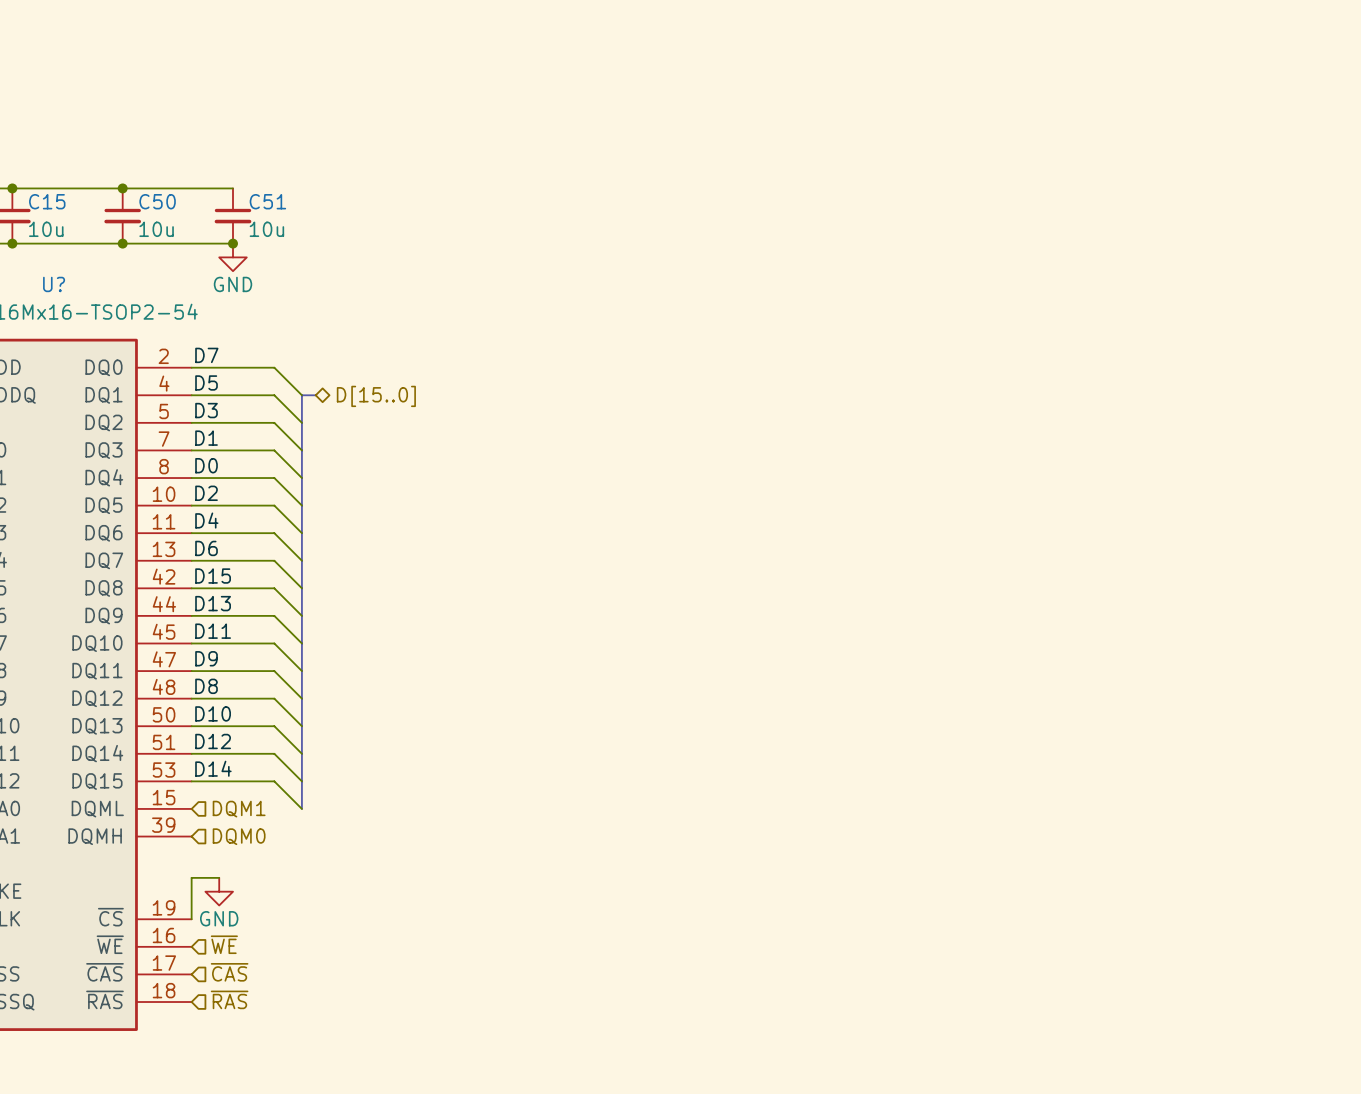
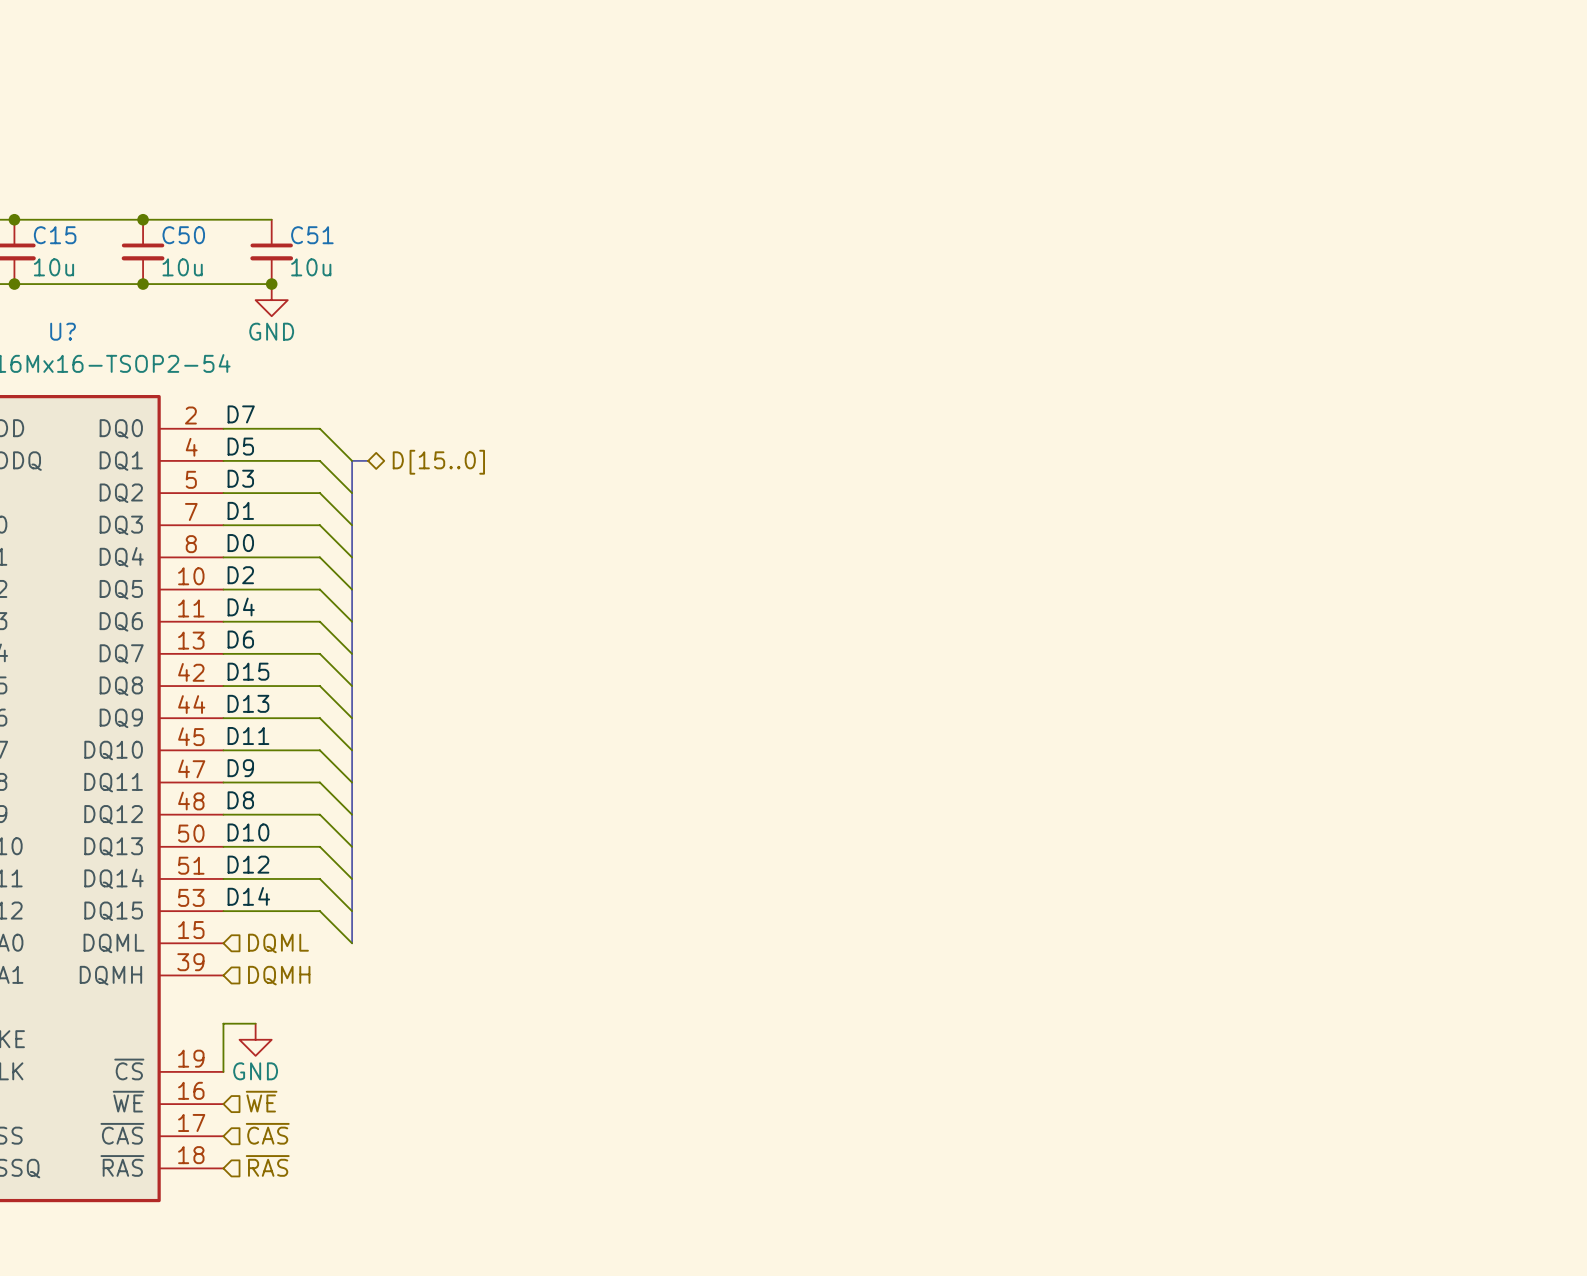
hierarchical label: DQM1 (239, 809) -> DQML (278, 943)
hierarchical label: DQM0 (239, 836) -> DQMH (279, 975)

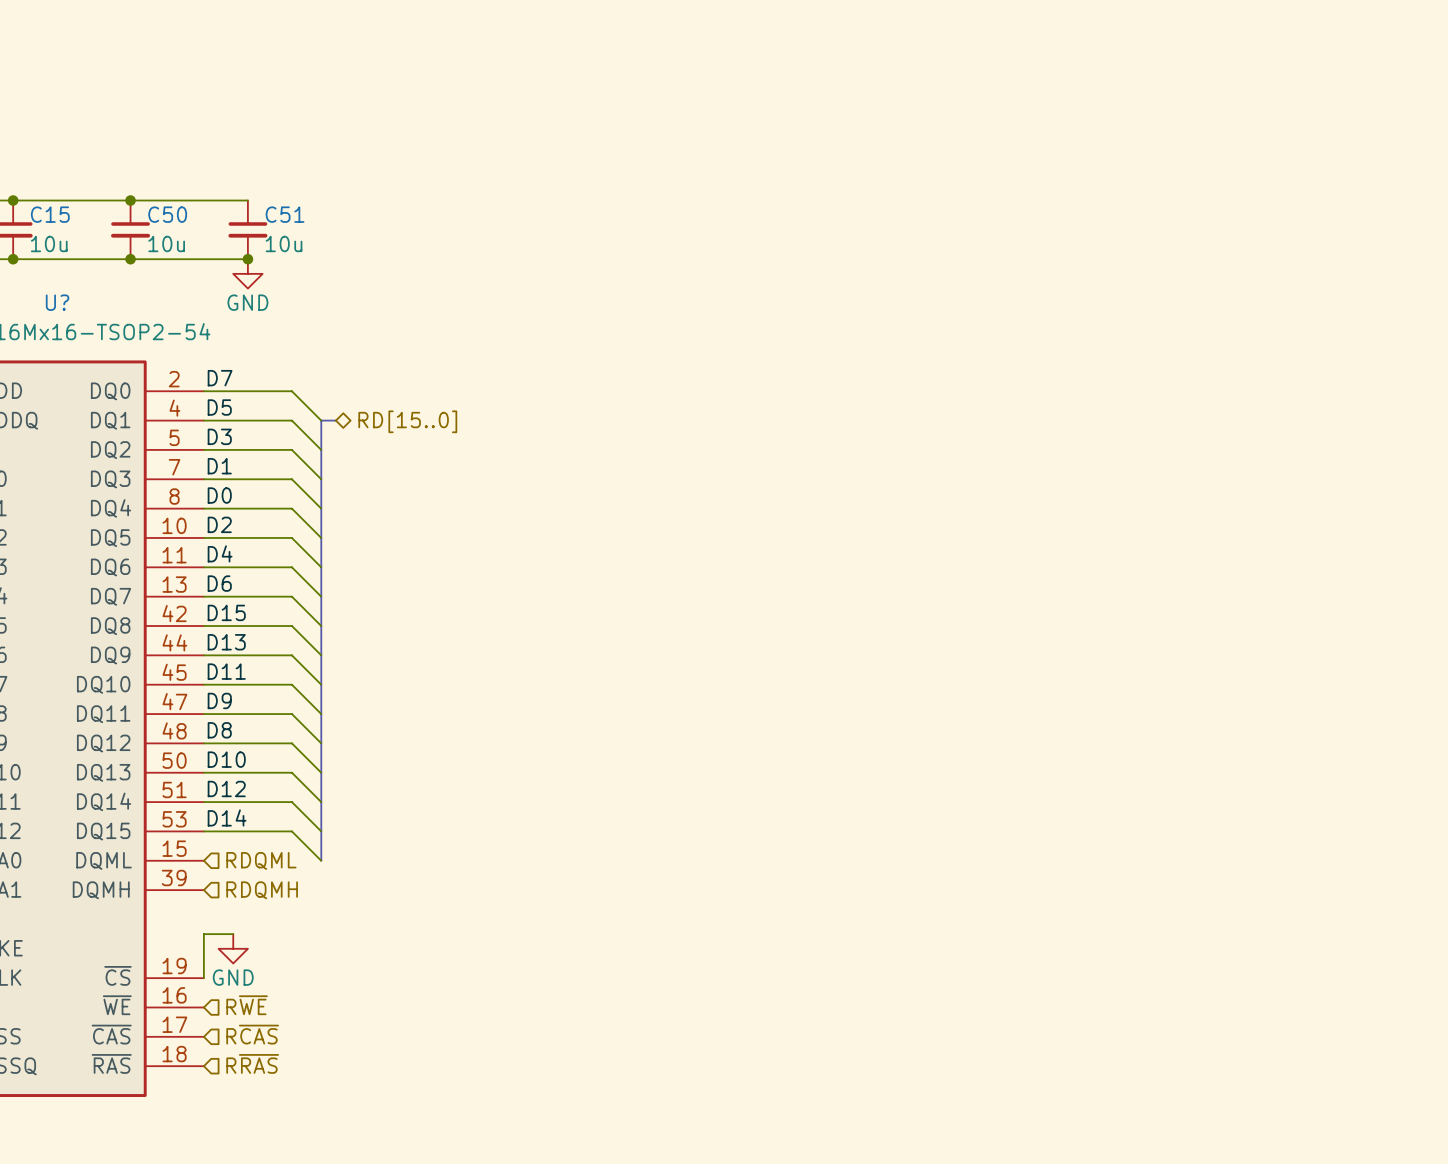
hierarchical label: D[15..0] (438, 462) -> RD[15..0] (407, 421)
hierarchical label: DQML (278, 943) -> RDQML (261, 860)
hierarchical label: DQMH (279, 975) -> RDQMH (262, 890)
hierarchical label: ~{WE} (261, 1101) -> R~{WE} (247, 1005)
hierarchical label: ~{CAS} (267, 1133) -> R~{CAS} (252, 1034)
hierarchical label: ~{RAS} (267, 1165) -> R~{RAS} (252, 1063)

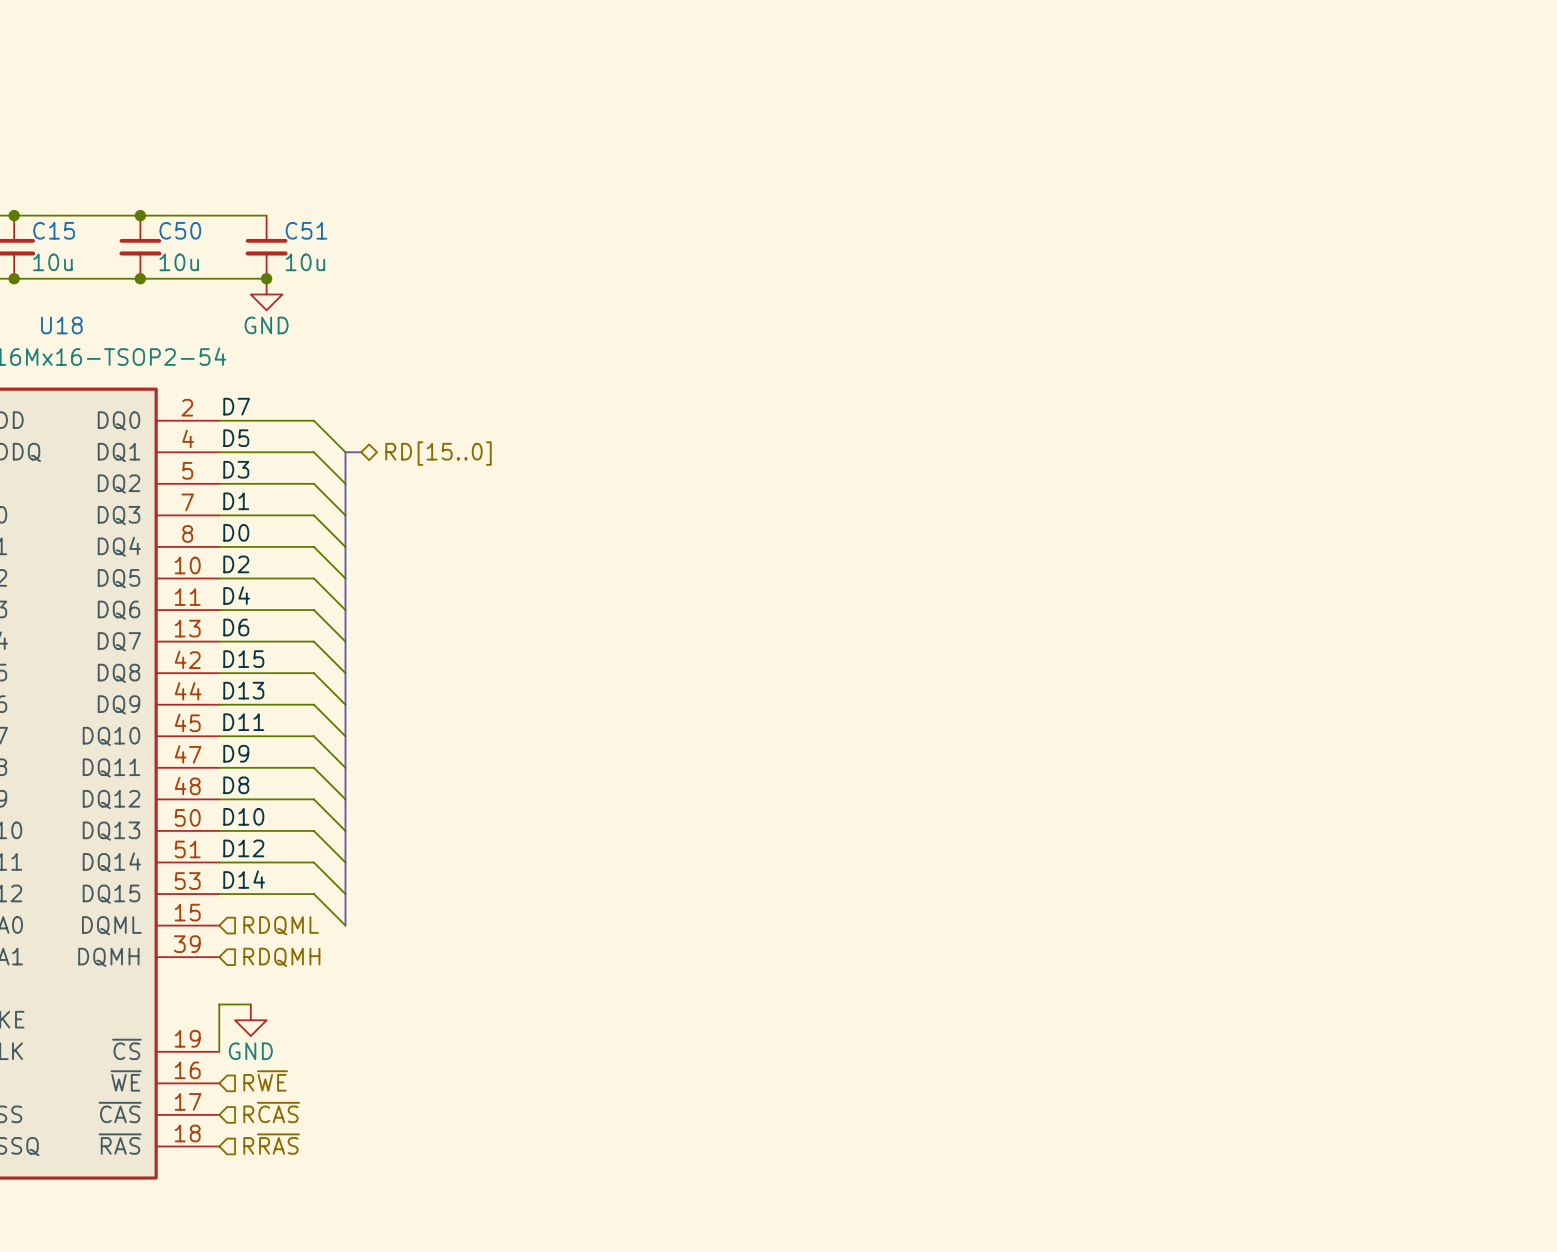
U? name: U? (57, 302) -> U18 (61, 325)

